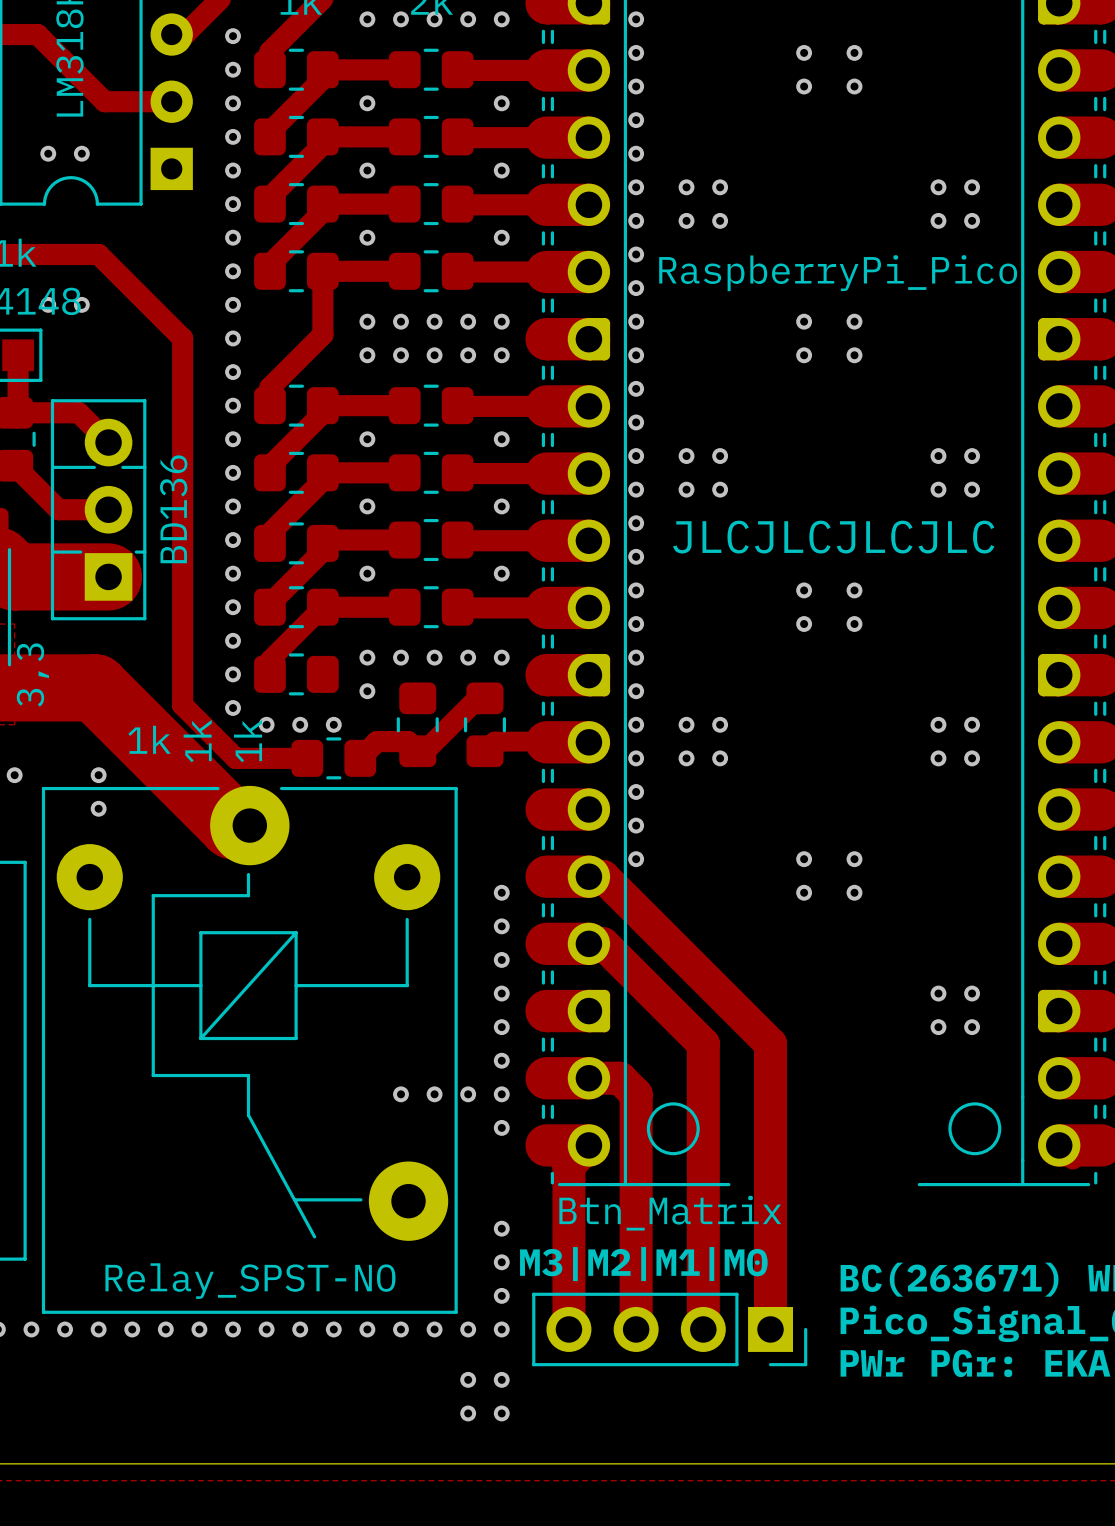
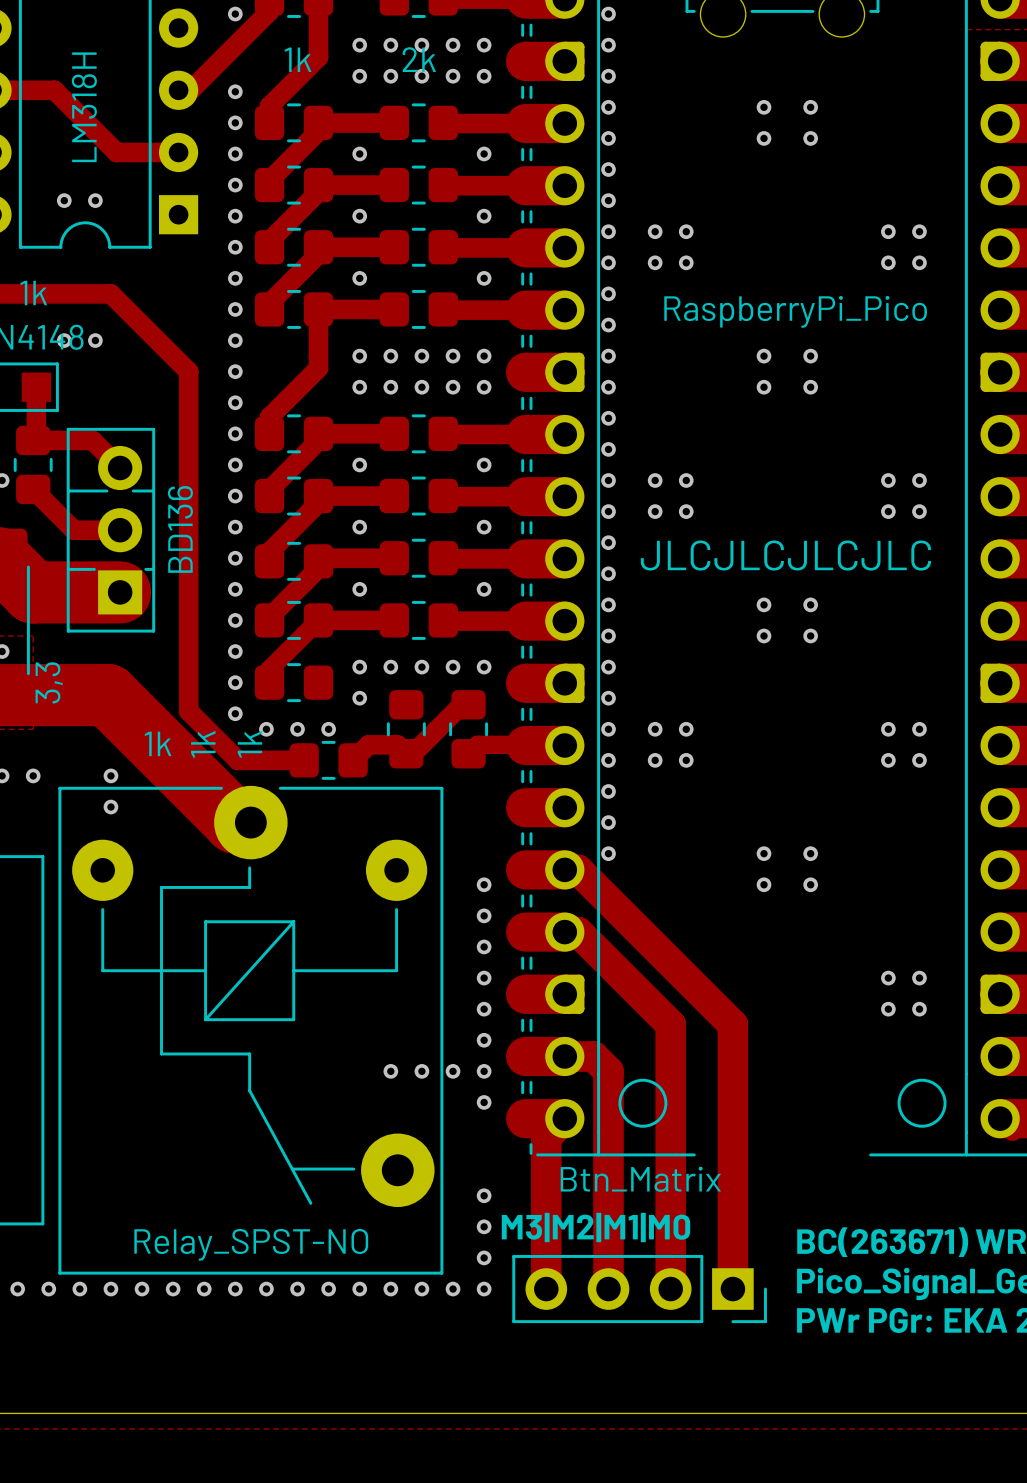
via: (468, 1379) -> none
via: (501, 1379) -> none
via: (468, 1413) -> none
via: (501, 1413) -> none

